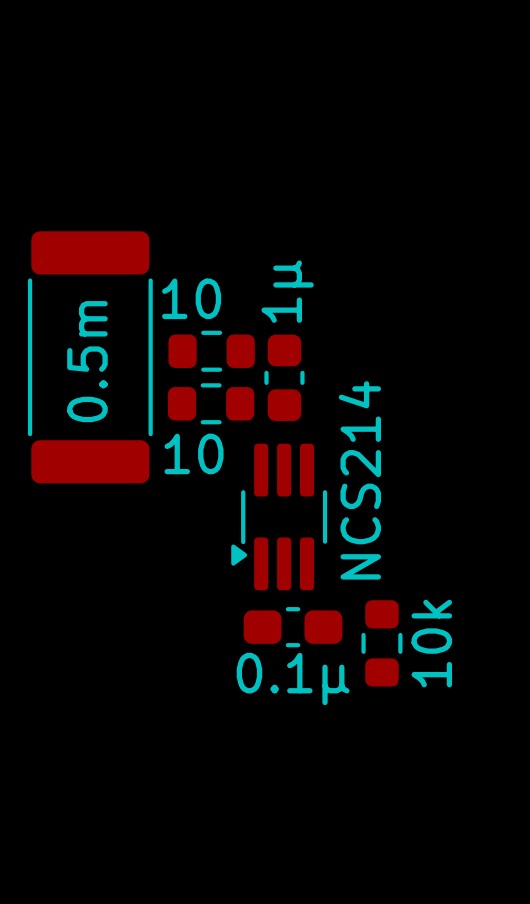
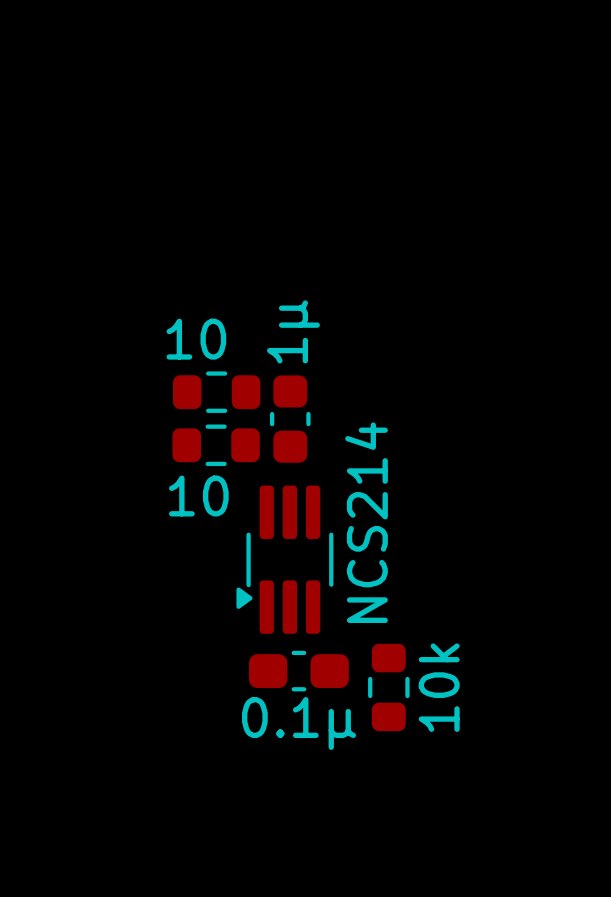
part: 0.5m (90, 357) -> none

